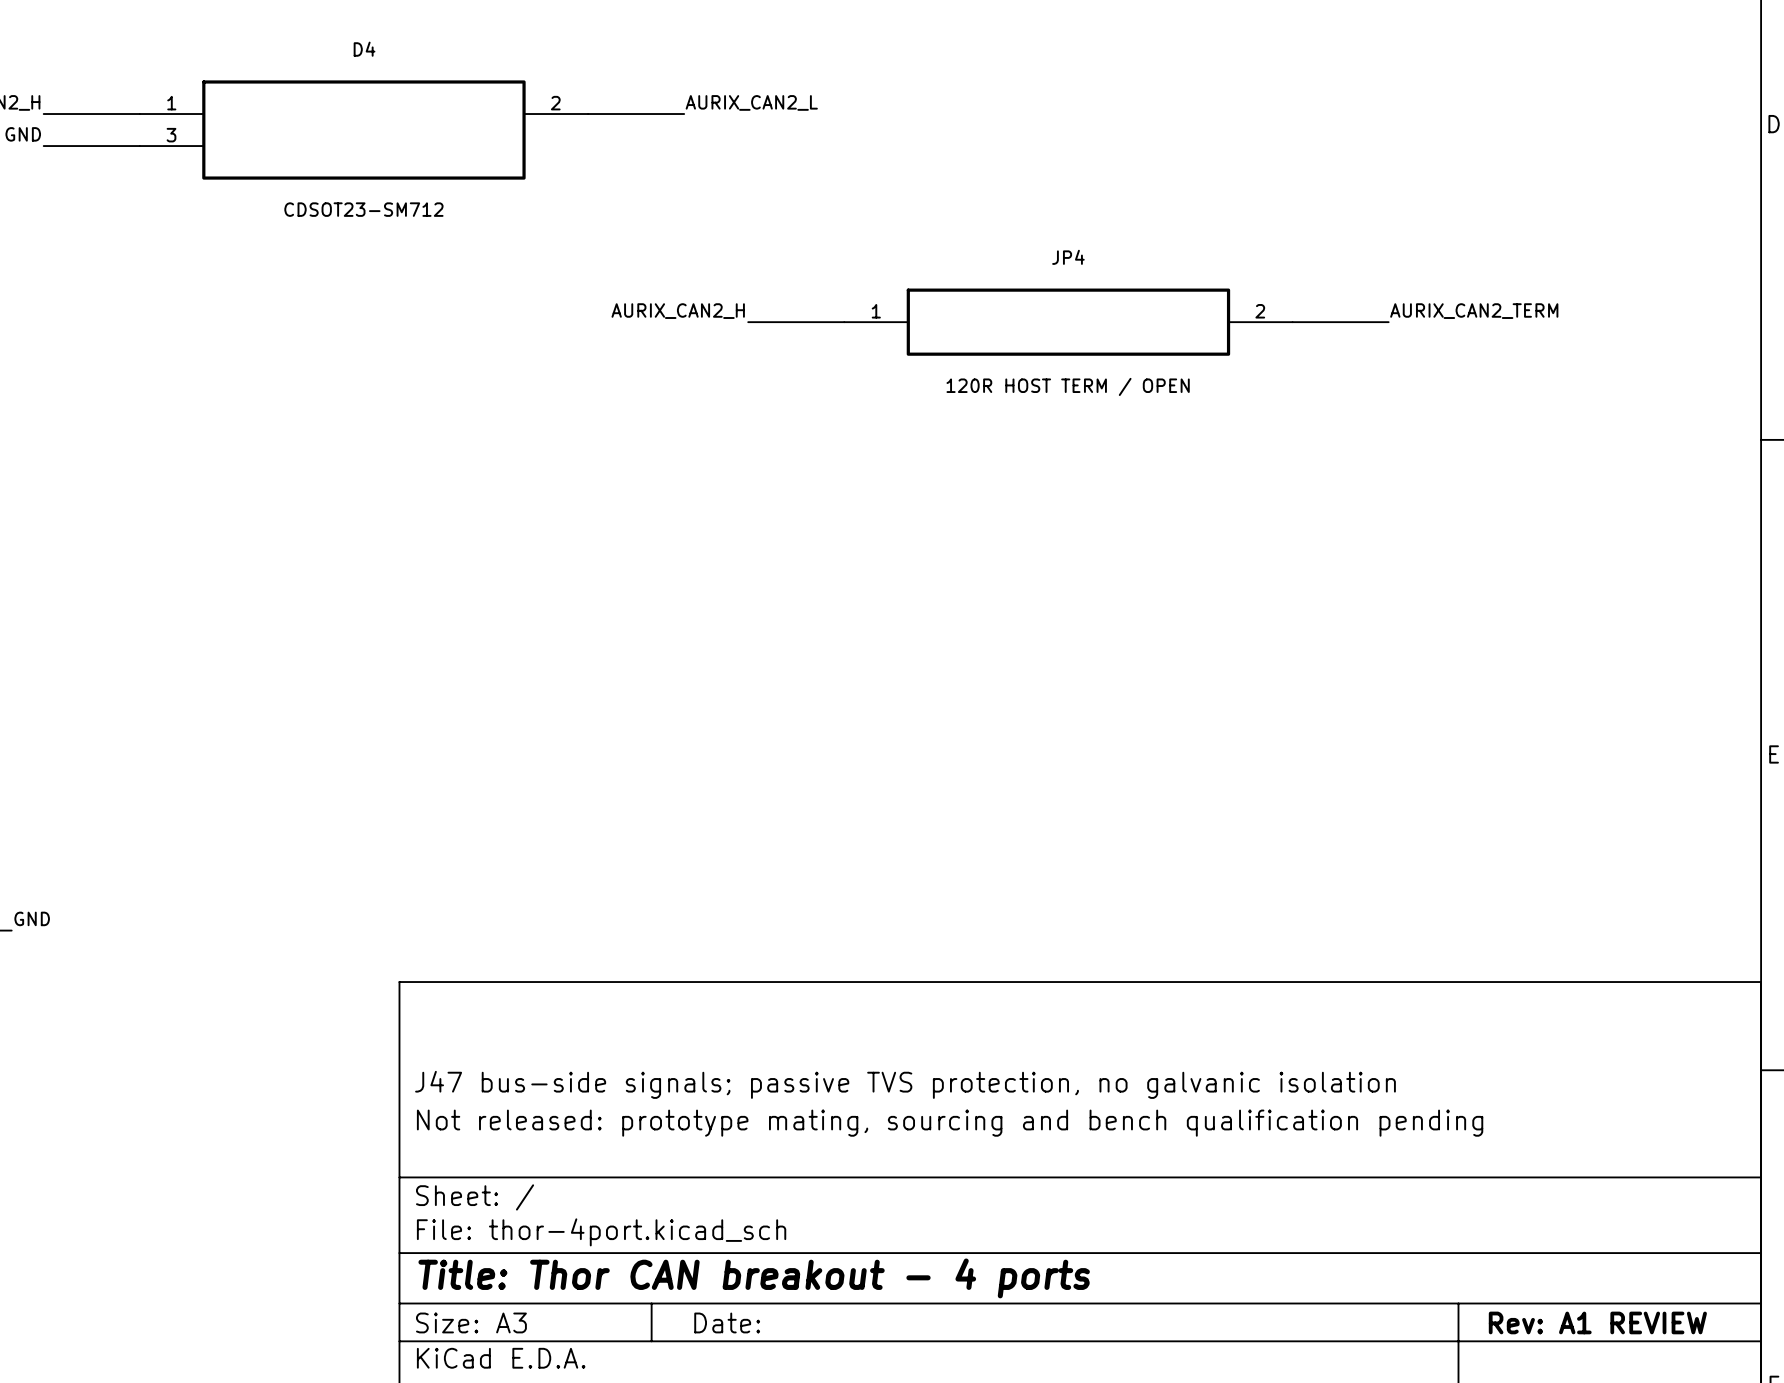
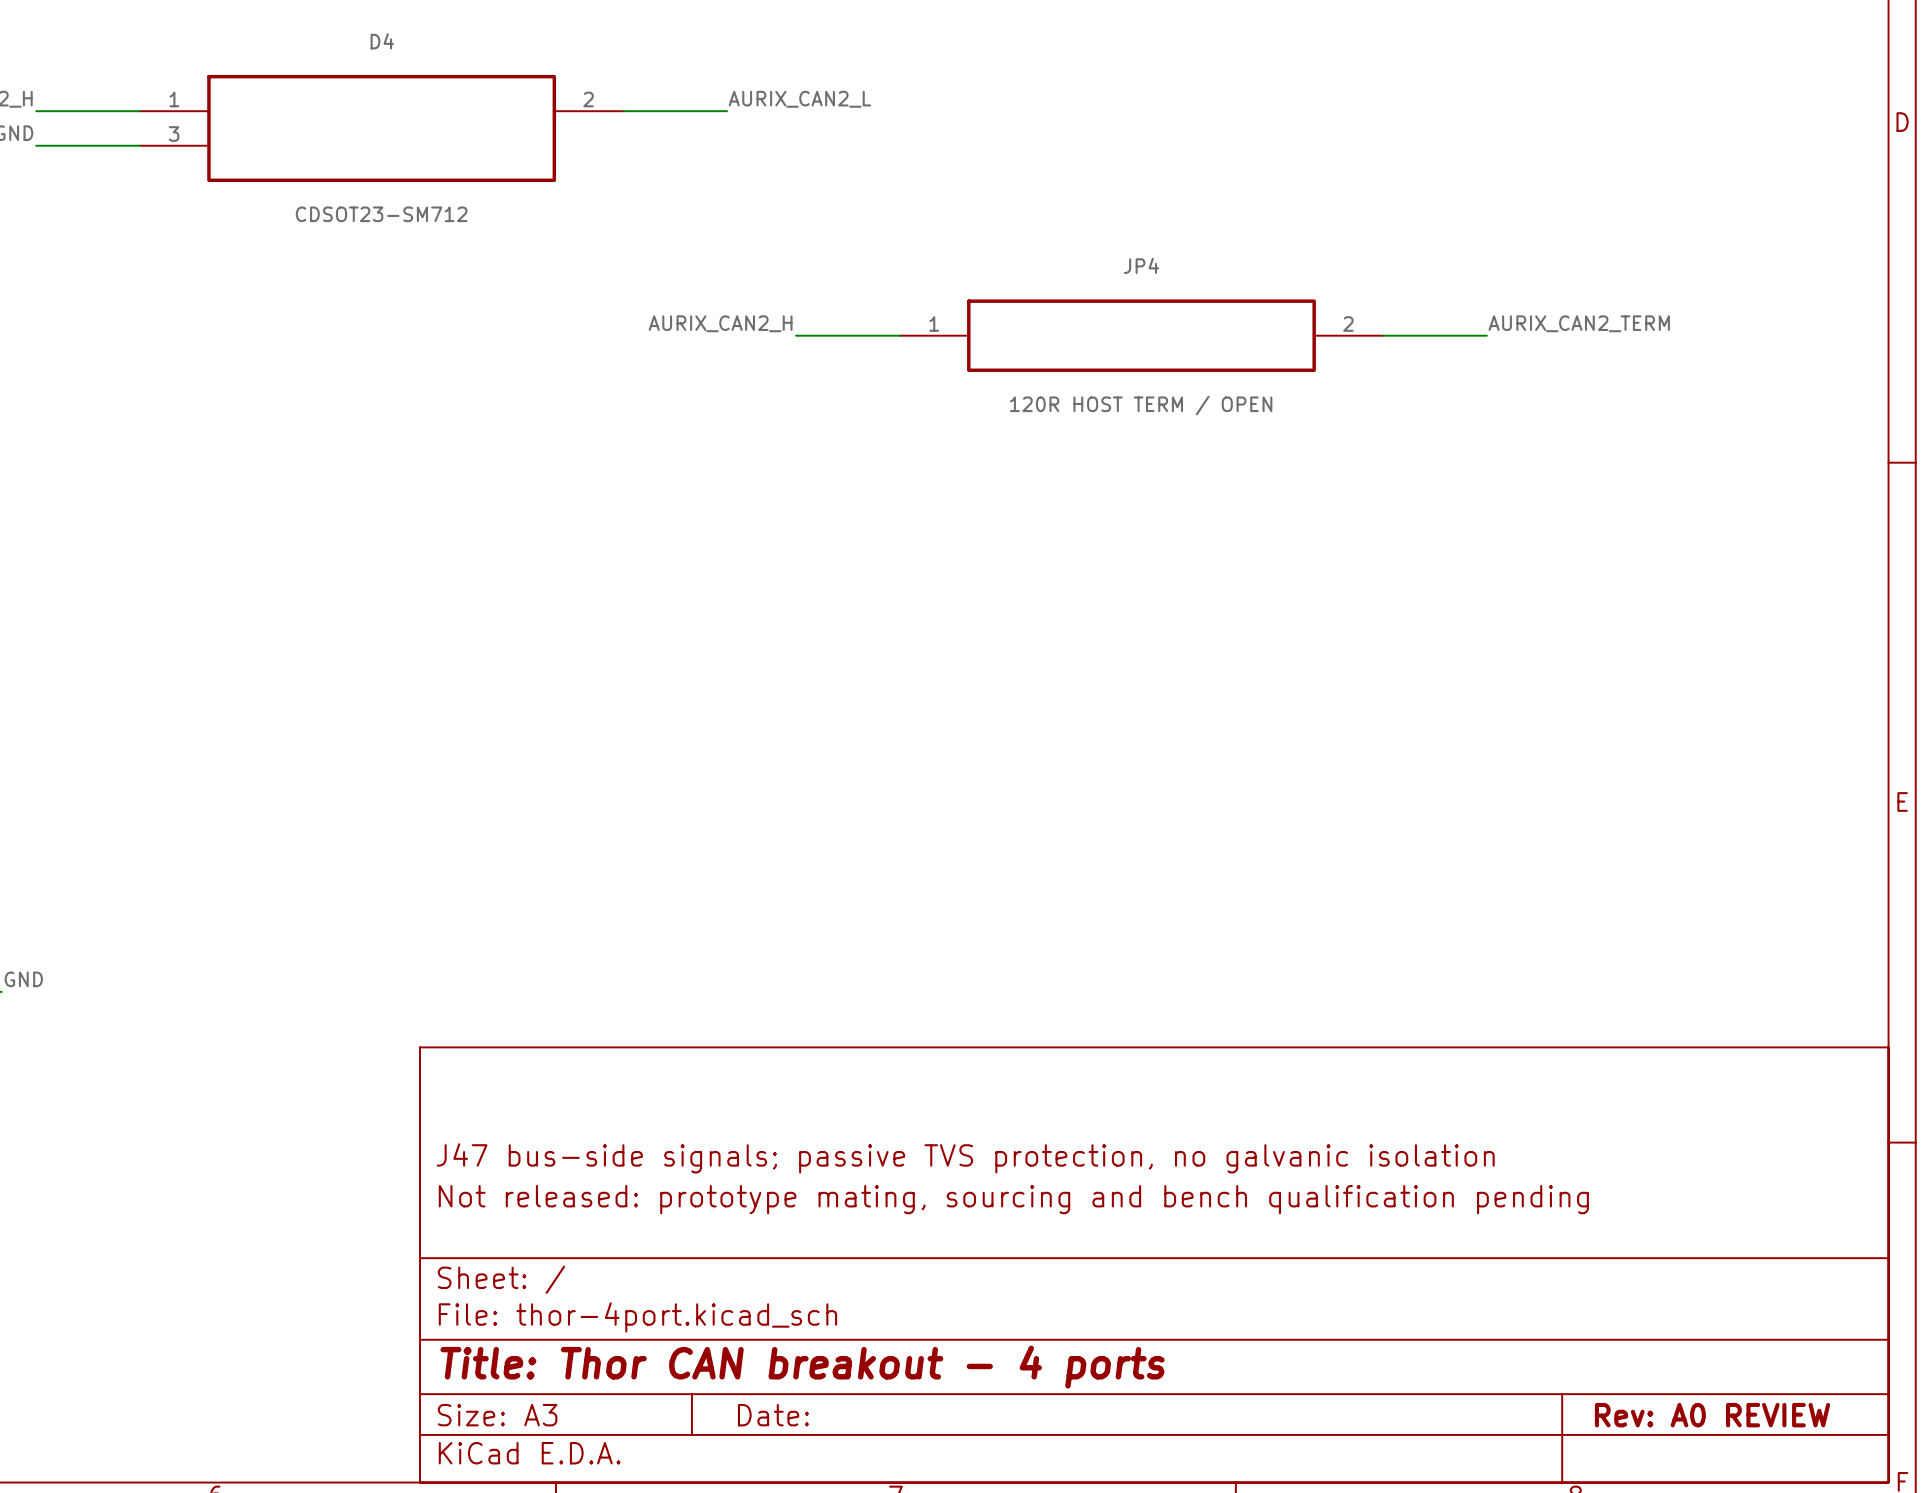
title block: Rev: A1 REVIEW (1597, 1322) -> Rev: A0 REVIEW (1712, 1415)

